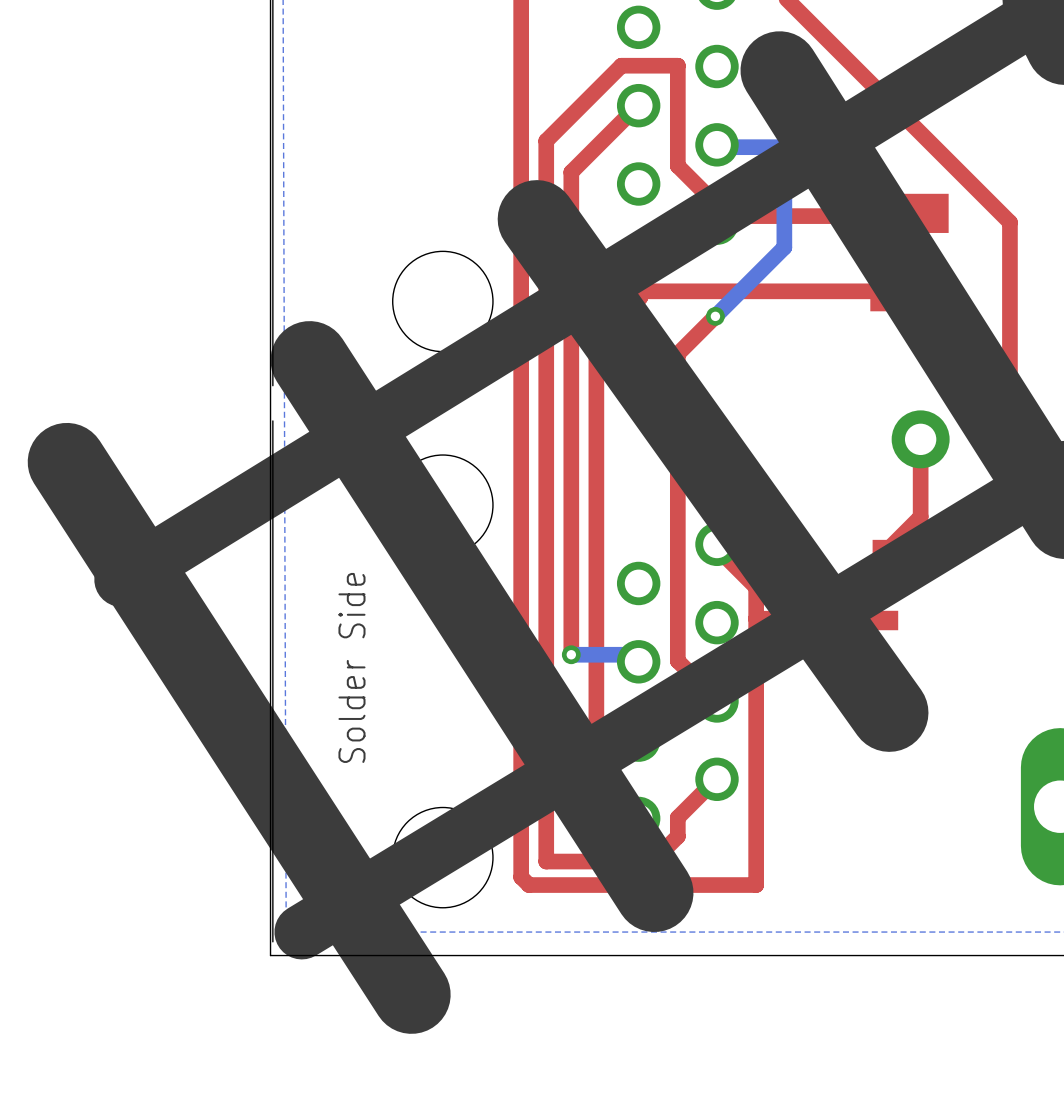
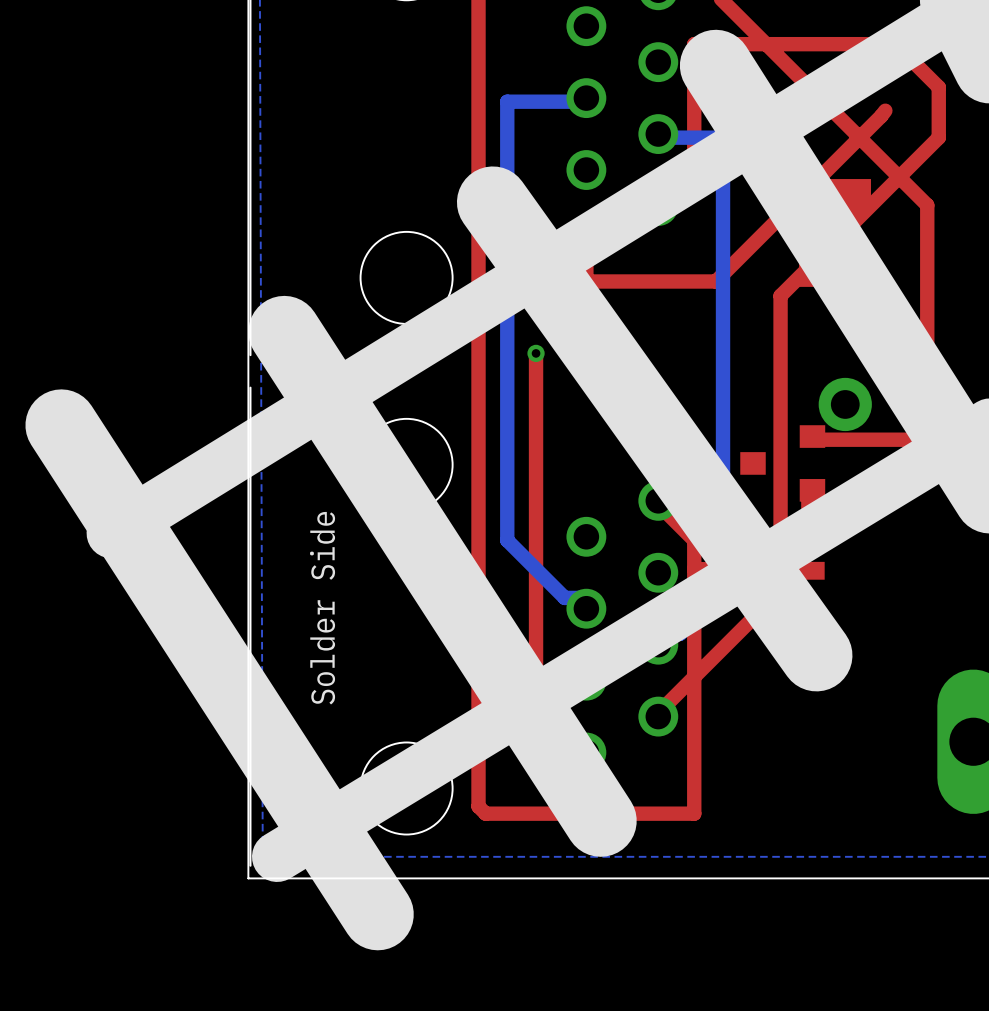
top track: (638, 105) (571, 172) (571, 654) -> none
top track: none -> (885, 110) (715, 281) (586, 281) (586, 241)
bottom track: (716, 144) (721, 147) (784, 147) (784, 247) (715, 316) -> (658, 134) (658, 137) (723, 137) (723, 590) (679, 633) (665, 633) (658, 641) (658, 644)
top track: (909, 213) (903, 216) (721, 216) (721, 222) (716, 223) (721, 209) (677, 165) (677, 65) (621, 65) (546, 140) (546, 861) (652, 861) (677, 836) (677, 817) (716, 779) -> (658, 205) (658, 202) (694, 166) (694, 44) (881, 44) (888, 36) (938, 87) (938, 137) (780, 295) (780, 590) (658, 712) (658, 716)
top track: (638, 262) (640, 297) (596, 341) (596, 780) (633, 817) (638, 818) -> (536, 353) (536, 698) (586, 748) (586, 752)
top track: (640, 291) (909, 291) -> none
top track: (715, 316) (677, 353) (677, 661) (716, 700) -> none
via: (715, 316) -> none
via: none -> (536, 353)
top track: (920, 439) (920, 516) (889, 548) (885, 549) -> none
top track: none -> (812, 436) (816, 439) (910, 439) (910, 476)
part: none -> (782, 463)
bottom track: (571, 654) (627, 654) (633, 661) (638, 661) -> (586, 98) (586, 101) (507, 101) (507, 540) (564, 597) (579, 597) (586, 605) (586, 608)
via: (571, 654) -> none

